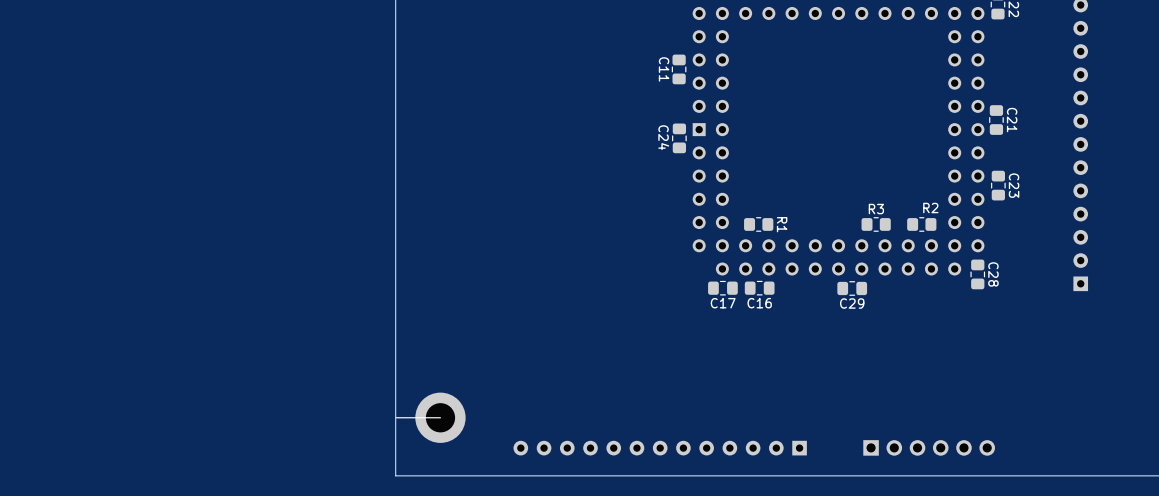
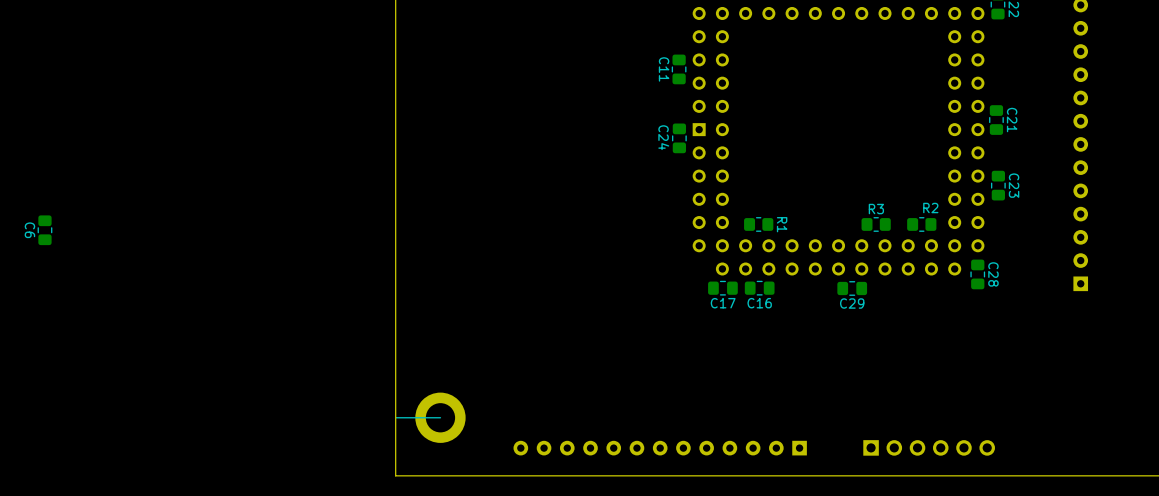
C6: none -> (44, 230)

